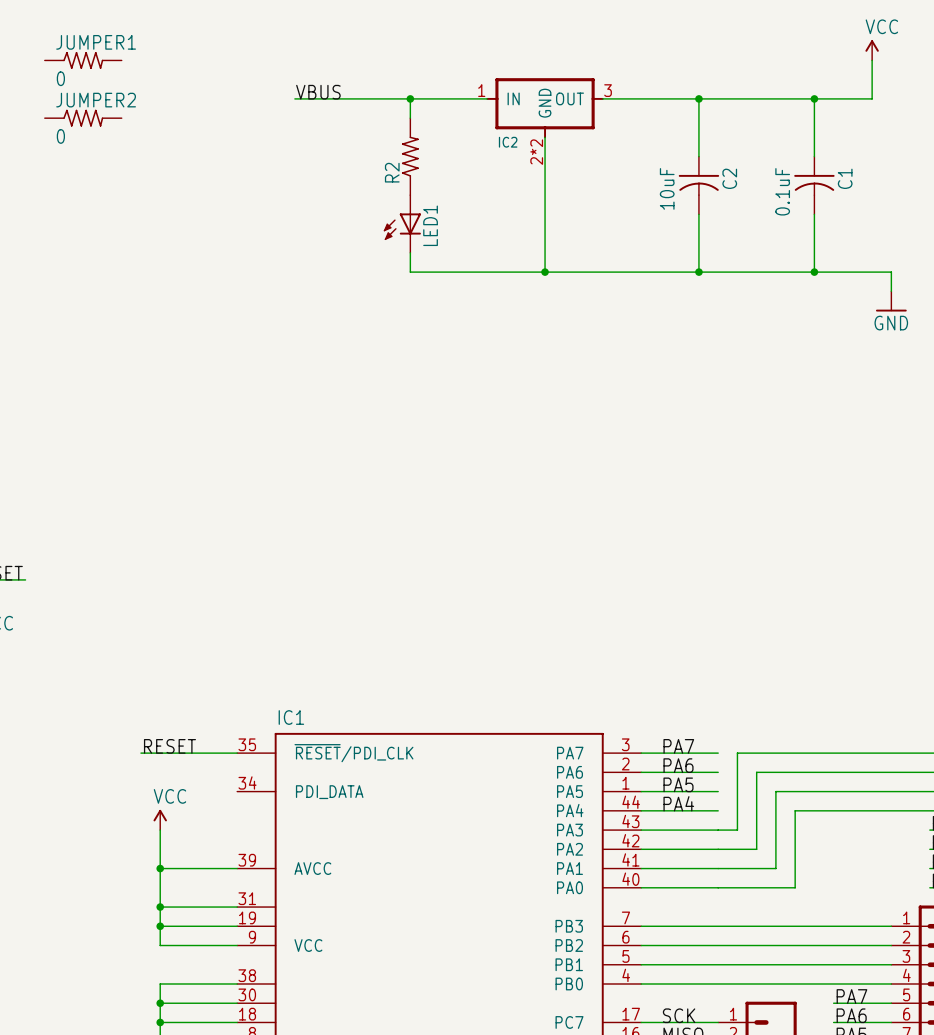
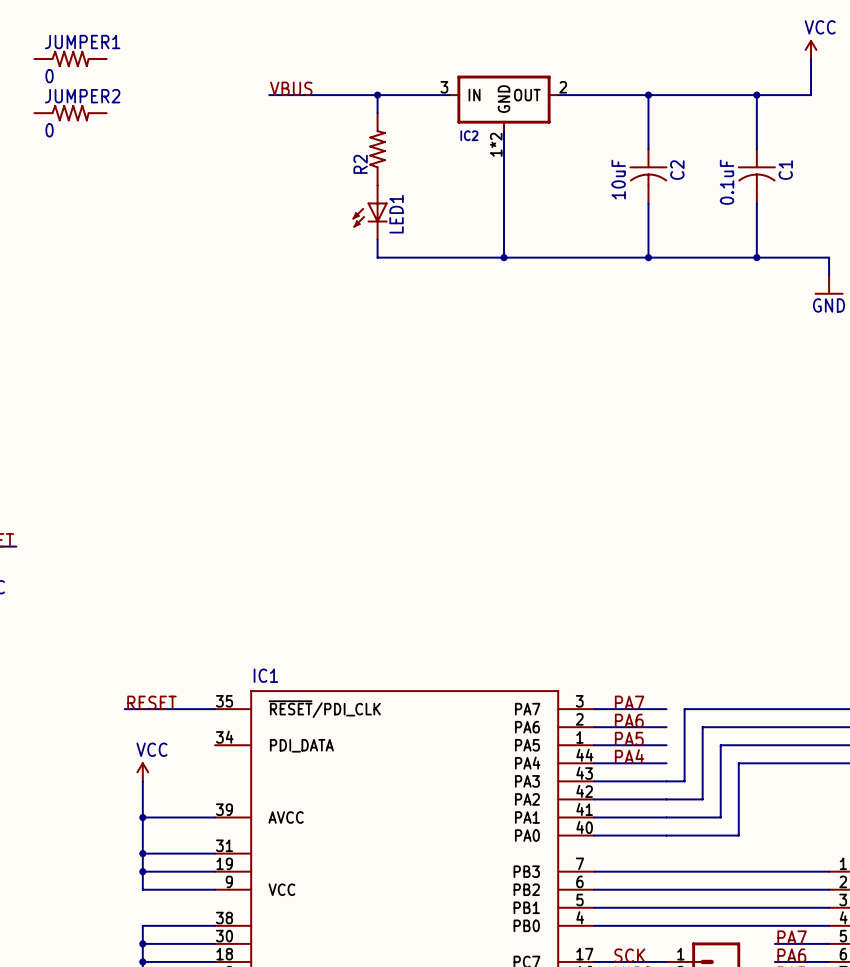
IC2 pin number: 1 (481, 90) -> 3 (444, 87)
IC2 pin number: 3 (608, 90) -> 2 (563, 87)
IC2 pin number: 2*2 (536, 152) -> 1*2 (496, 144)

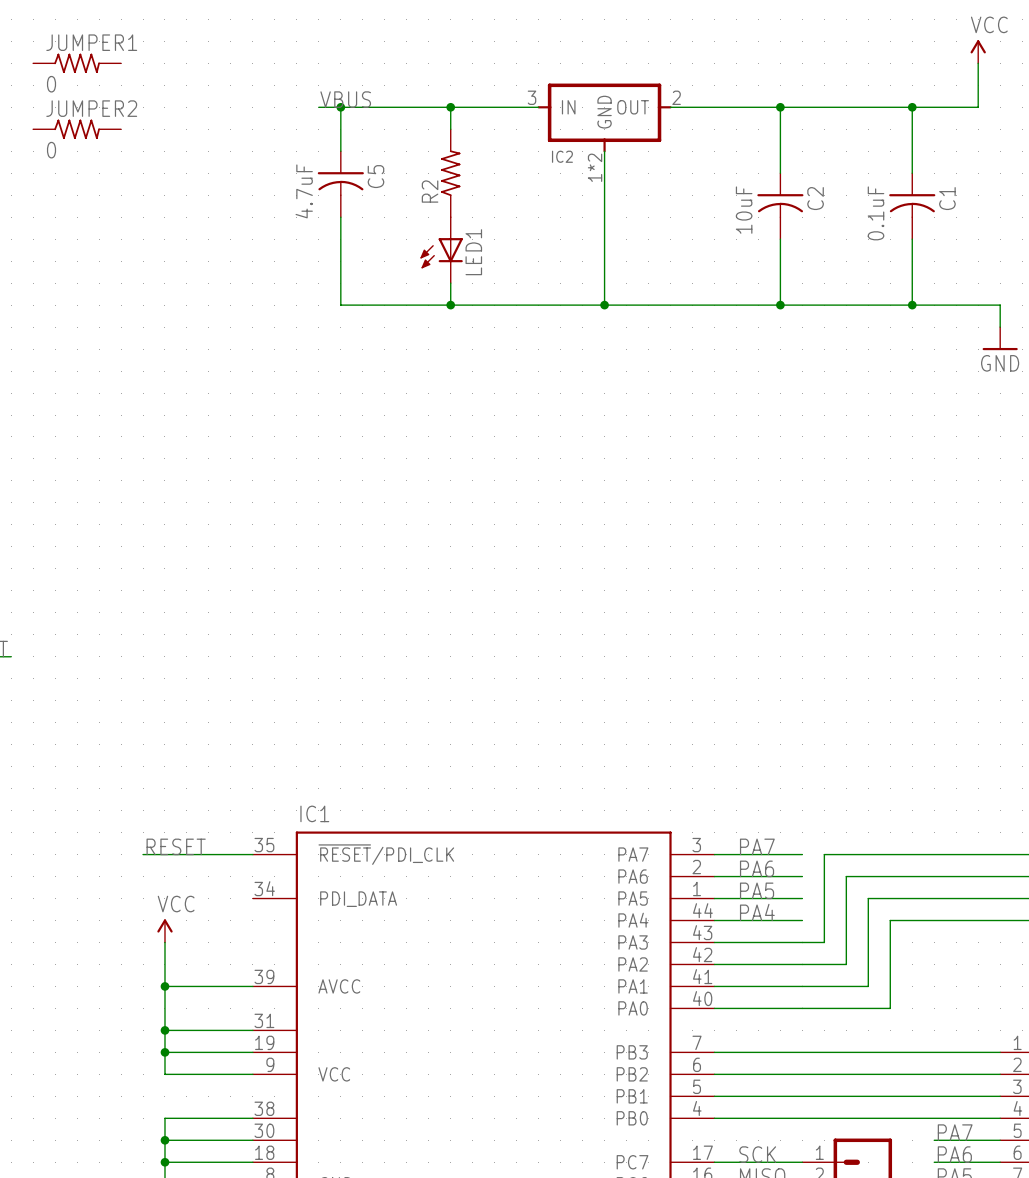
wire: none -> (340, 107) (340, 151)
junction: none -> (340, 107)
C5: none -> 4.7uF (340, 184)
wire: none -> (340, 217) (340, 305) (450, 305)
junction: none -> (450, 305)

